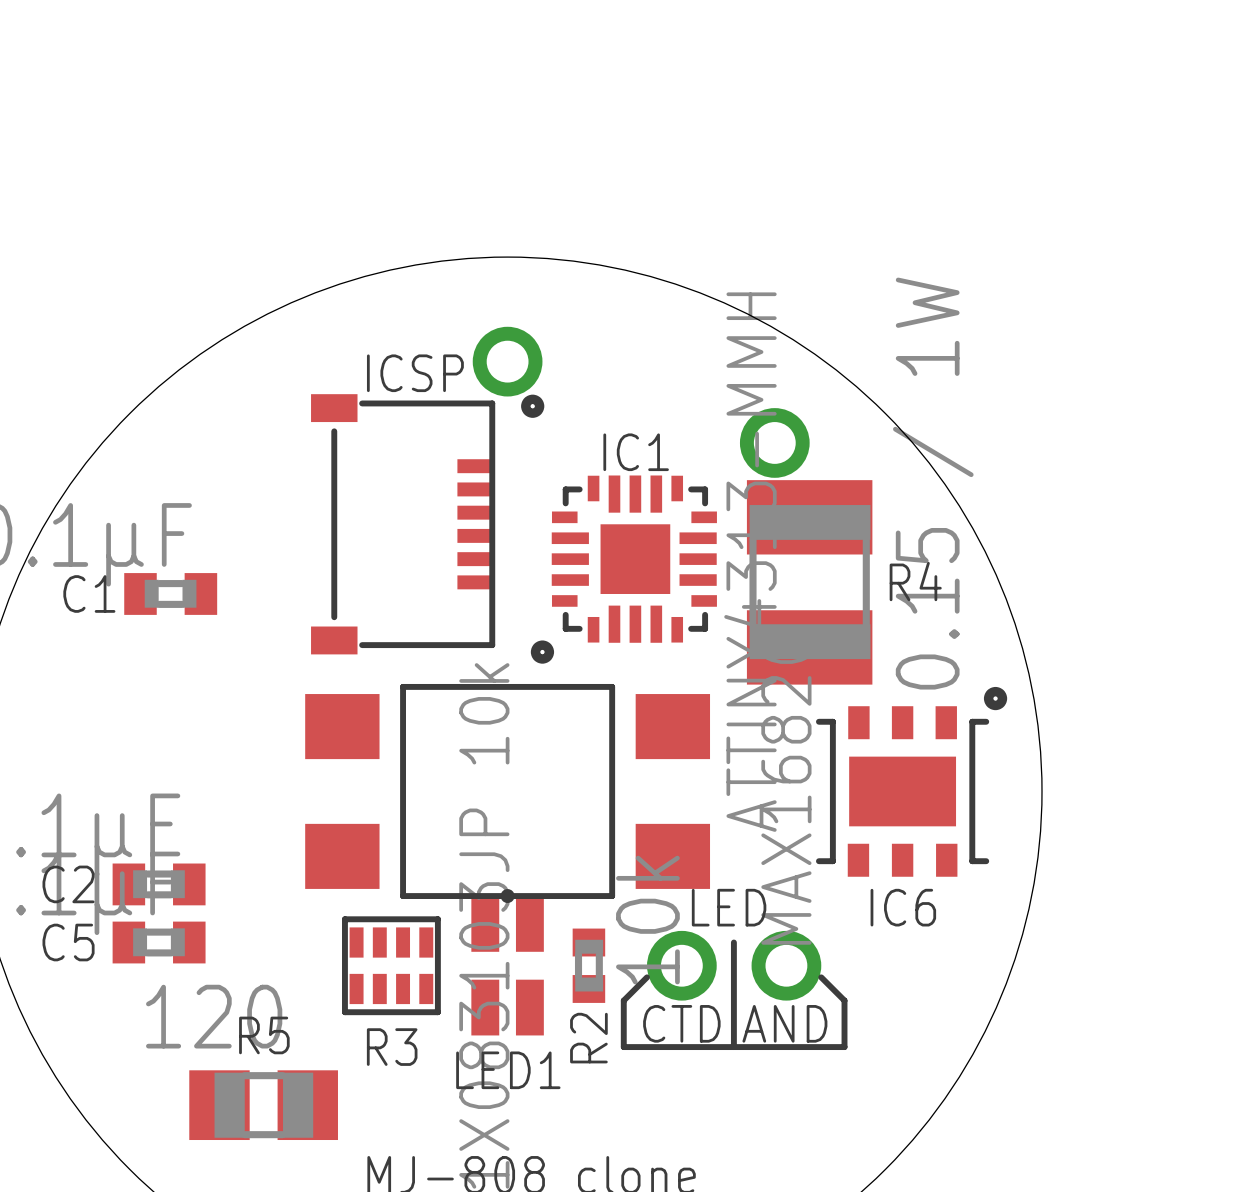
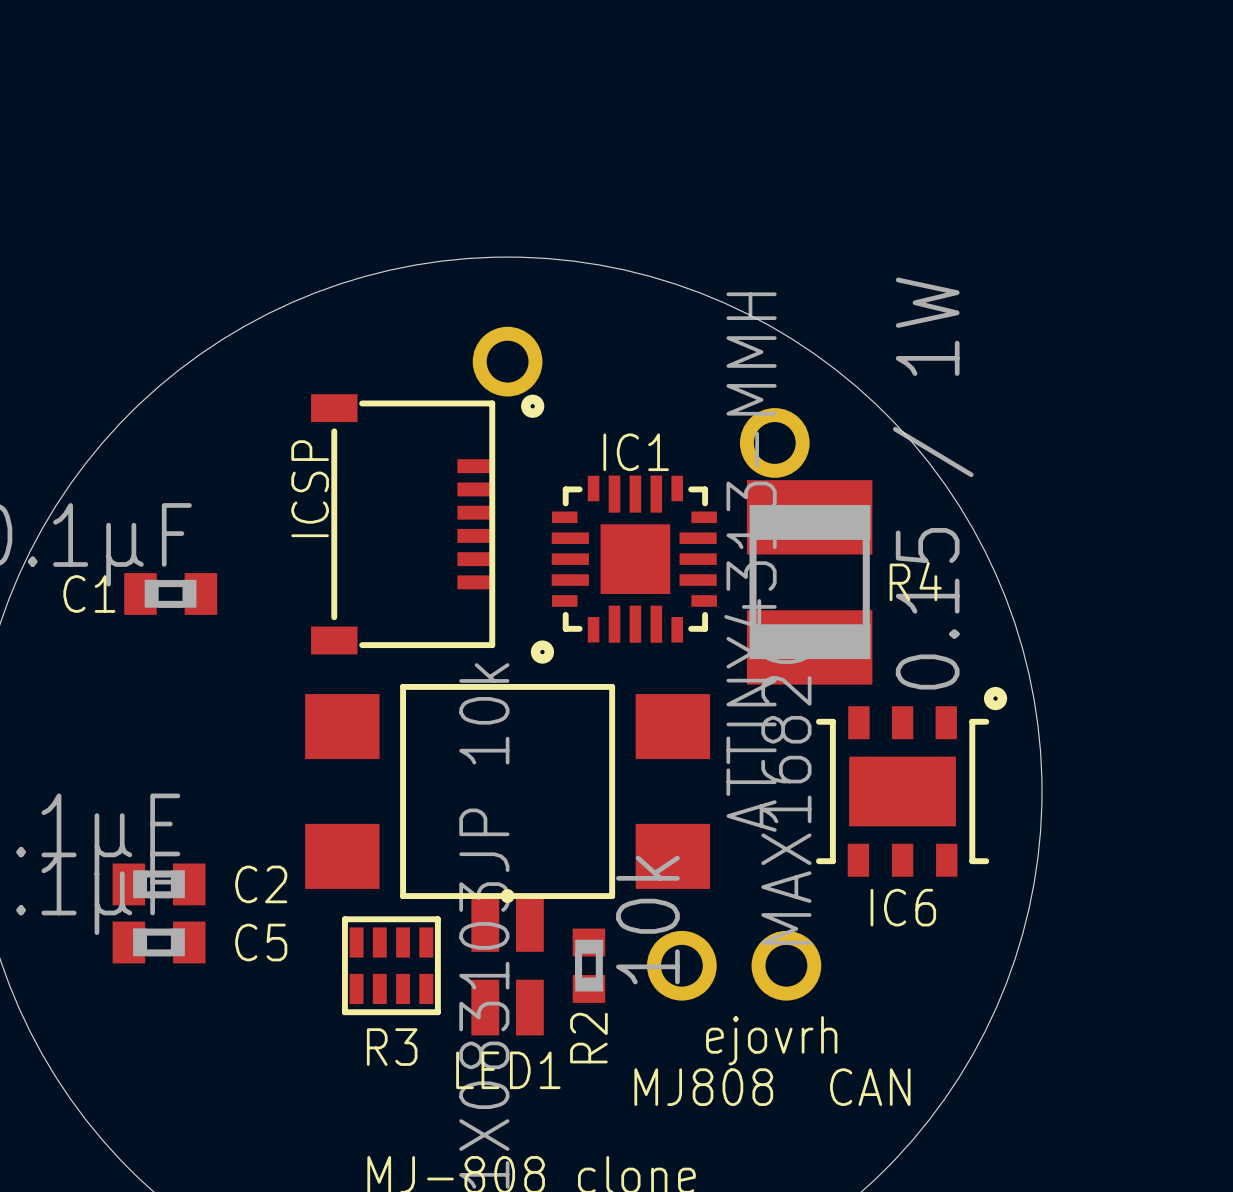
ICSP name rotation: 0° (415, 373) -> 90° counterclockwise (310, 488)
ICSP name position: ICSP (415, 373) -> ICSP (310, 488)
C2 name position: C2 (68, 884) -> C2 (261, 884)
text: LED (729, 907) -> none
C5 name position: C5 (68, 942) -> C5 (261, 942)
line: (733, 942) (733, 1047) -> none
line: (647, 977) (623, 1000) (623, 1047) (844, 1047) (844, 1000) (821, 977) -> none
CTD name: CTD (681, 1023) -> none
AND name: AND (784, 1023) -> none
text: none -> ejovrh (771, 1040)
text: none -> MJ808 CAN (772, 1087)
R5: 120 (263, 1105) -> none

